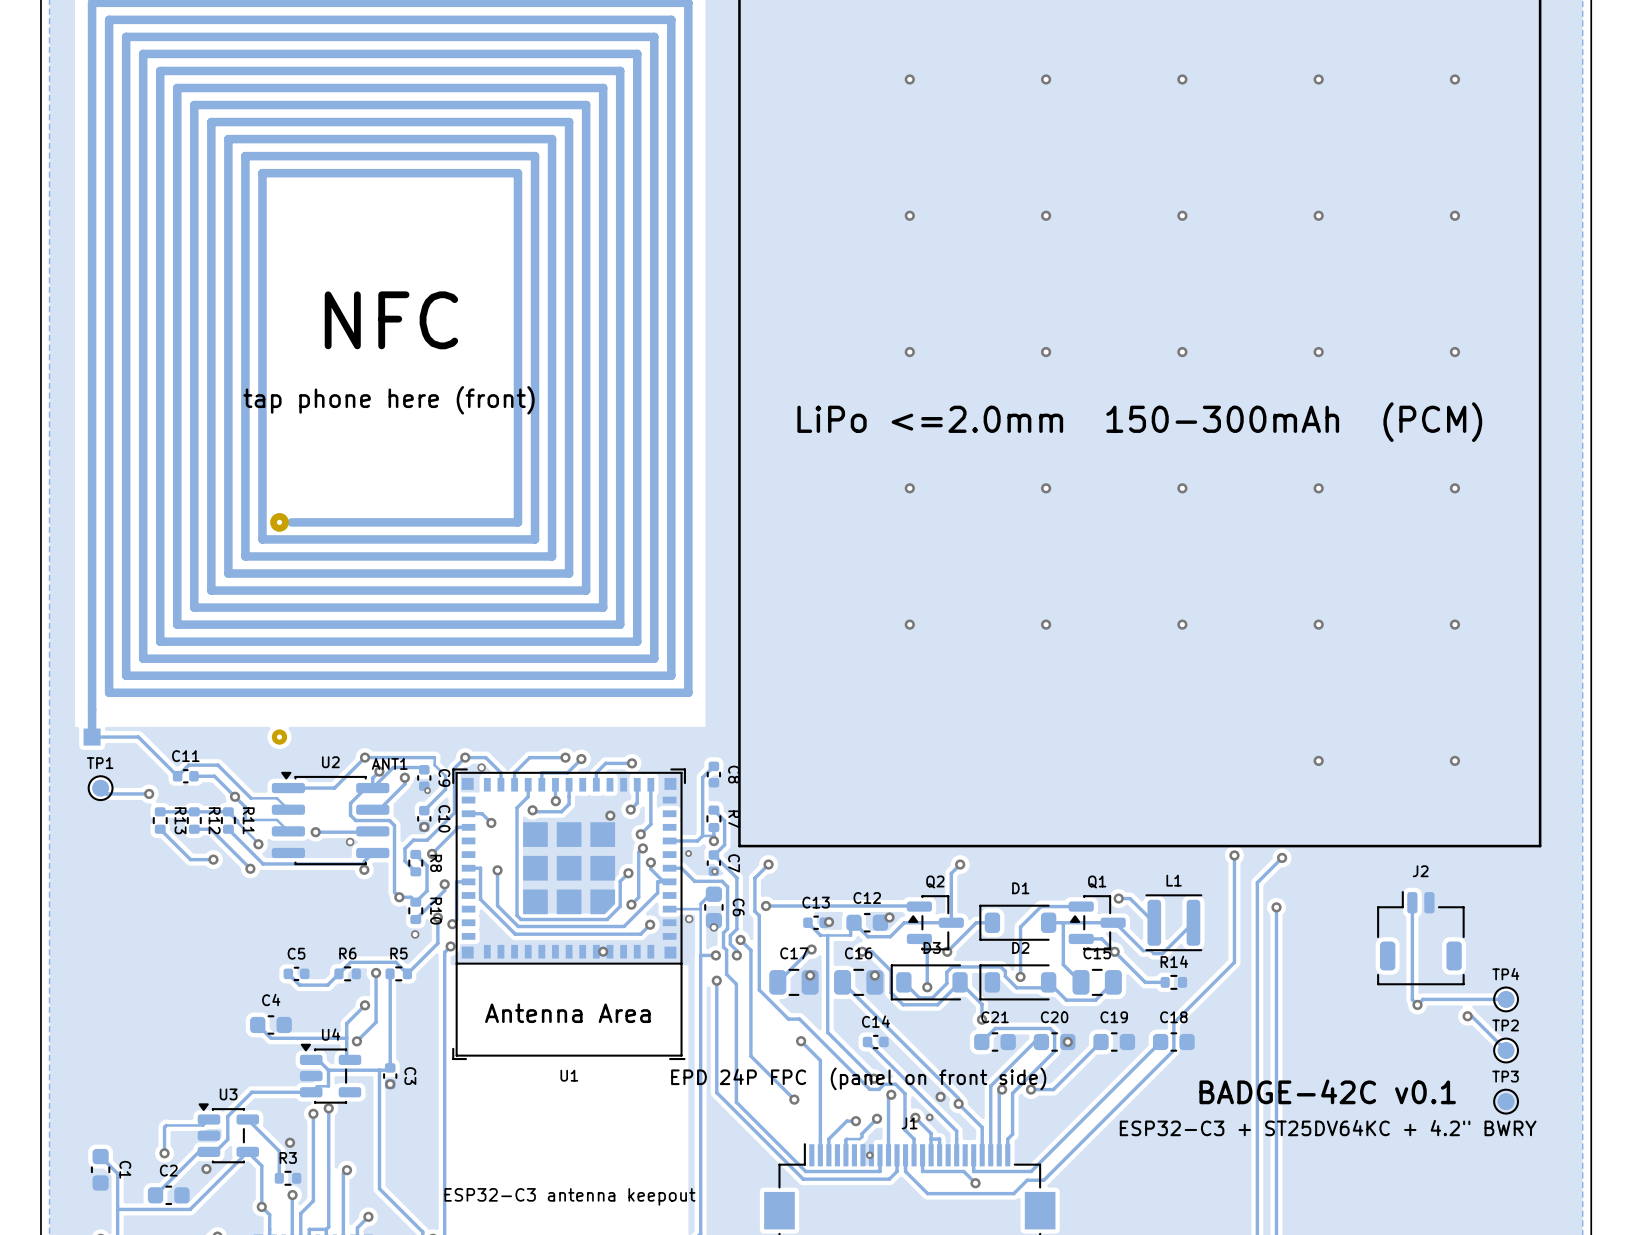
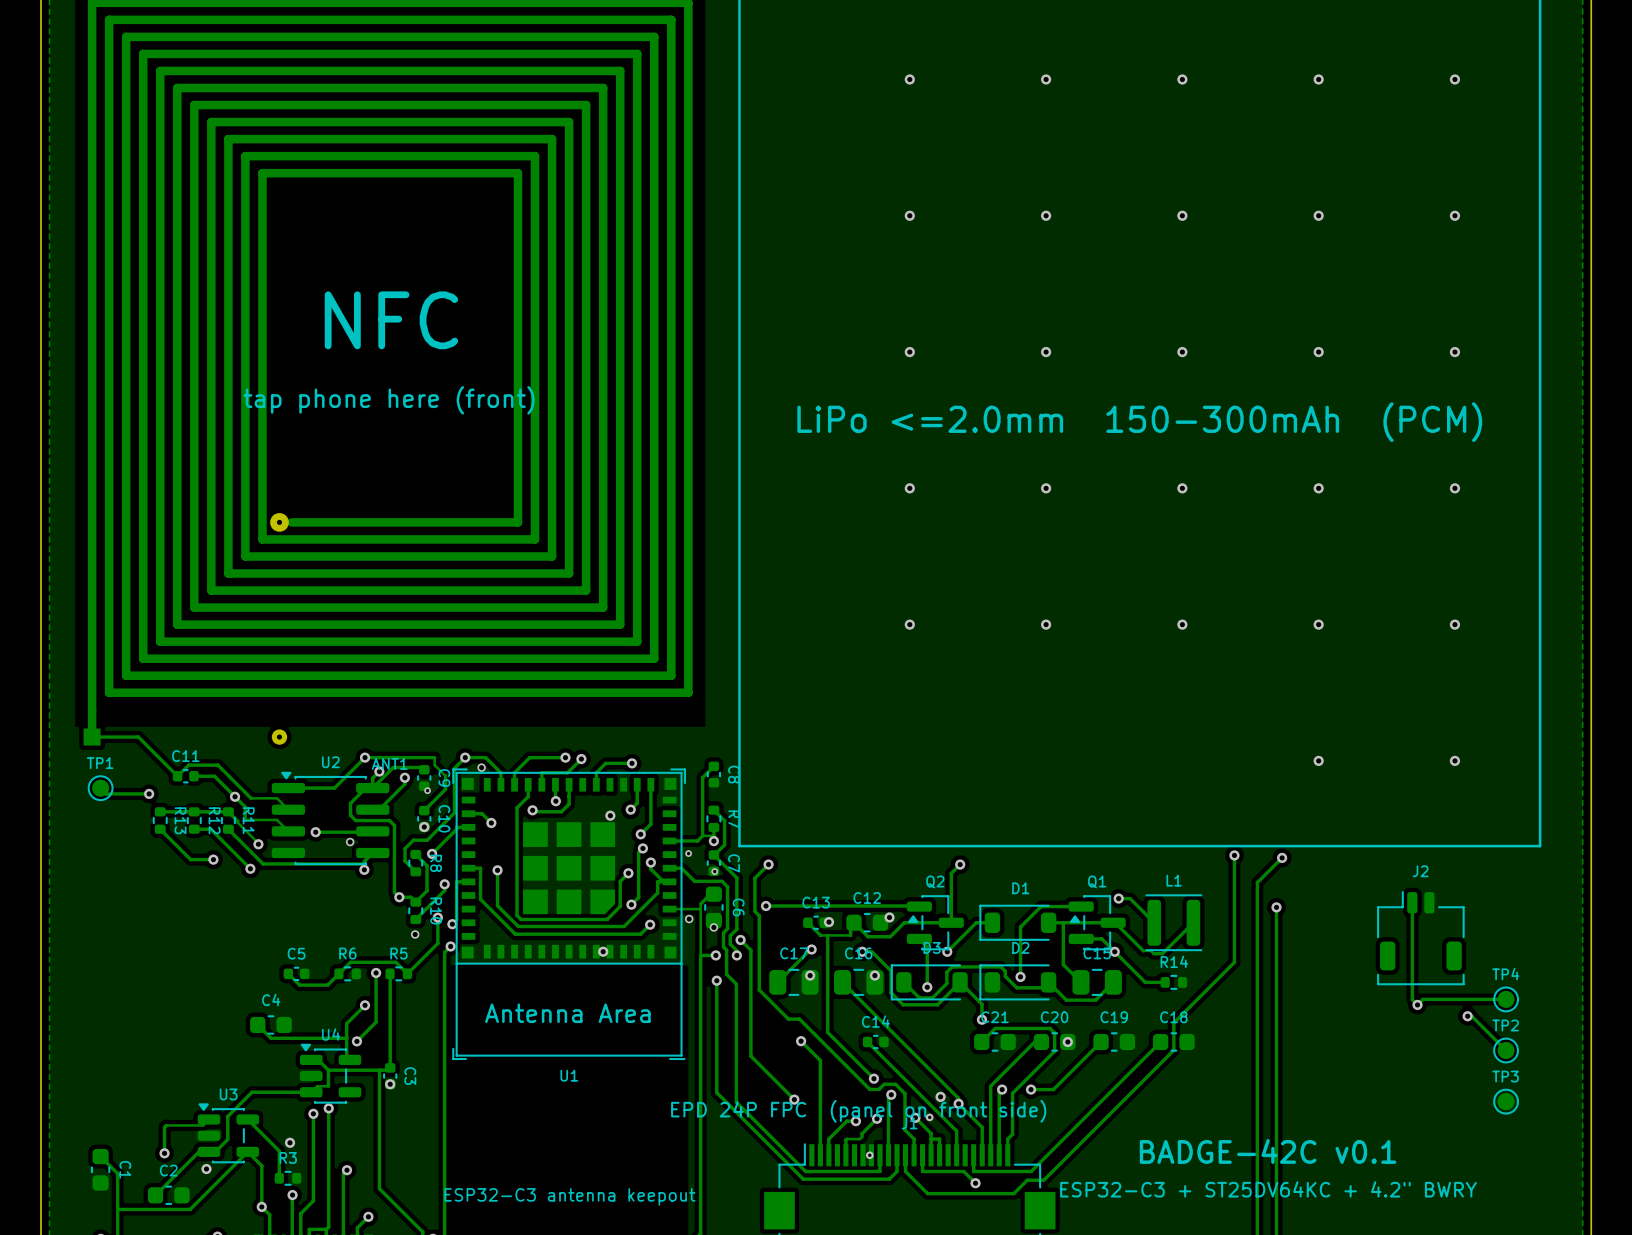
text position: EPD 24P FPC (panel on front side) (858, 1078) -> EPD 24P FPC (panel on front side) (858, 1111)
text position: BADGE-42C v0.1 (1327, 1091) -> BADGE-42C v0.1 (1268, 1151)
text position: ESP32-C3 + ST25DV64KC + 4.2" BWRY (1328, 1128) -> ESP32-C3 + ST25DV64KC + 4.2" BWRY (1268, 1189)

